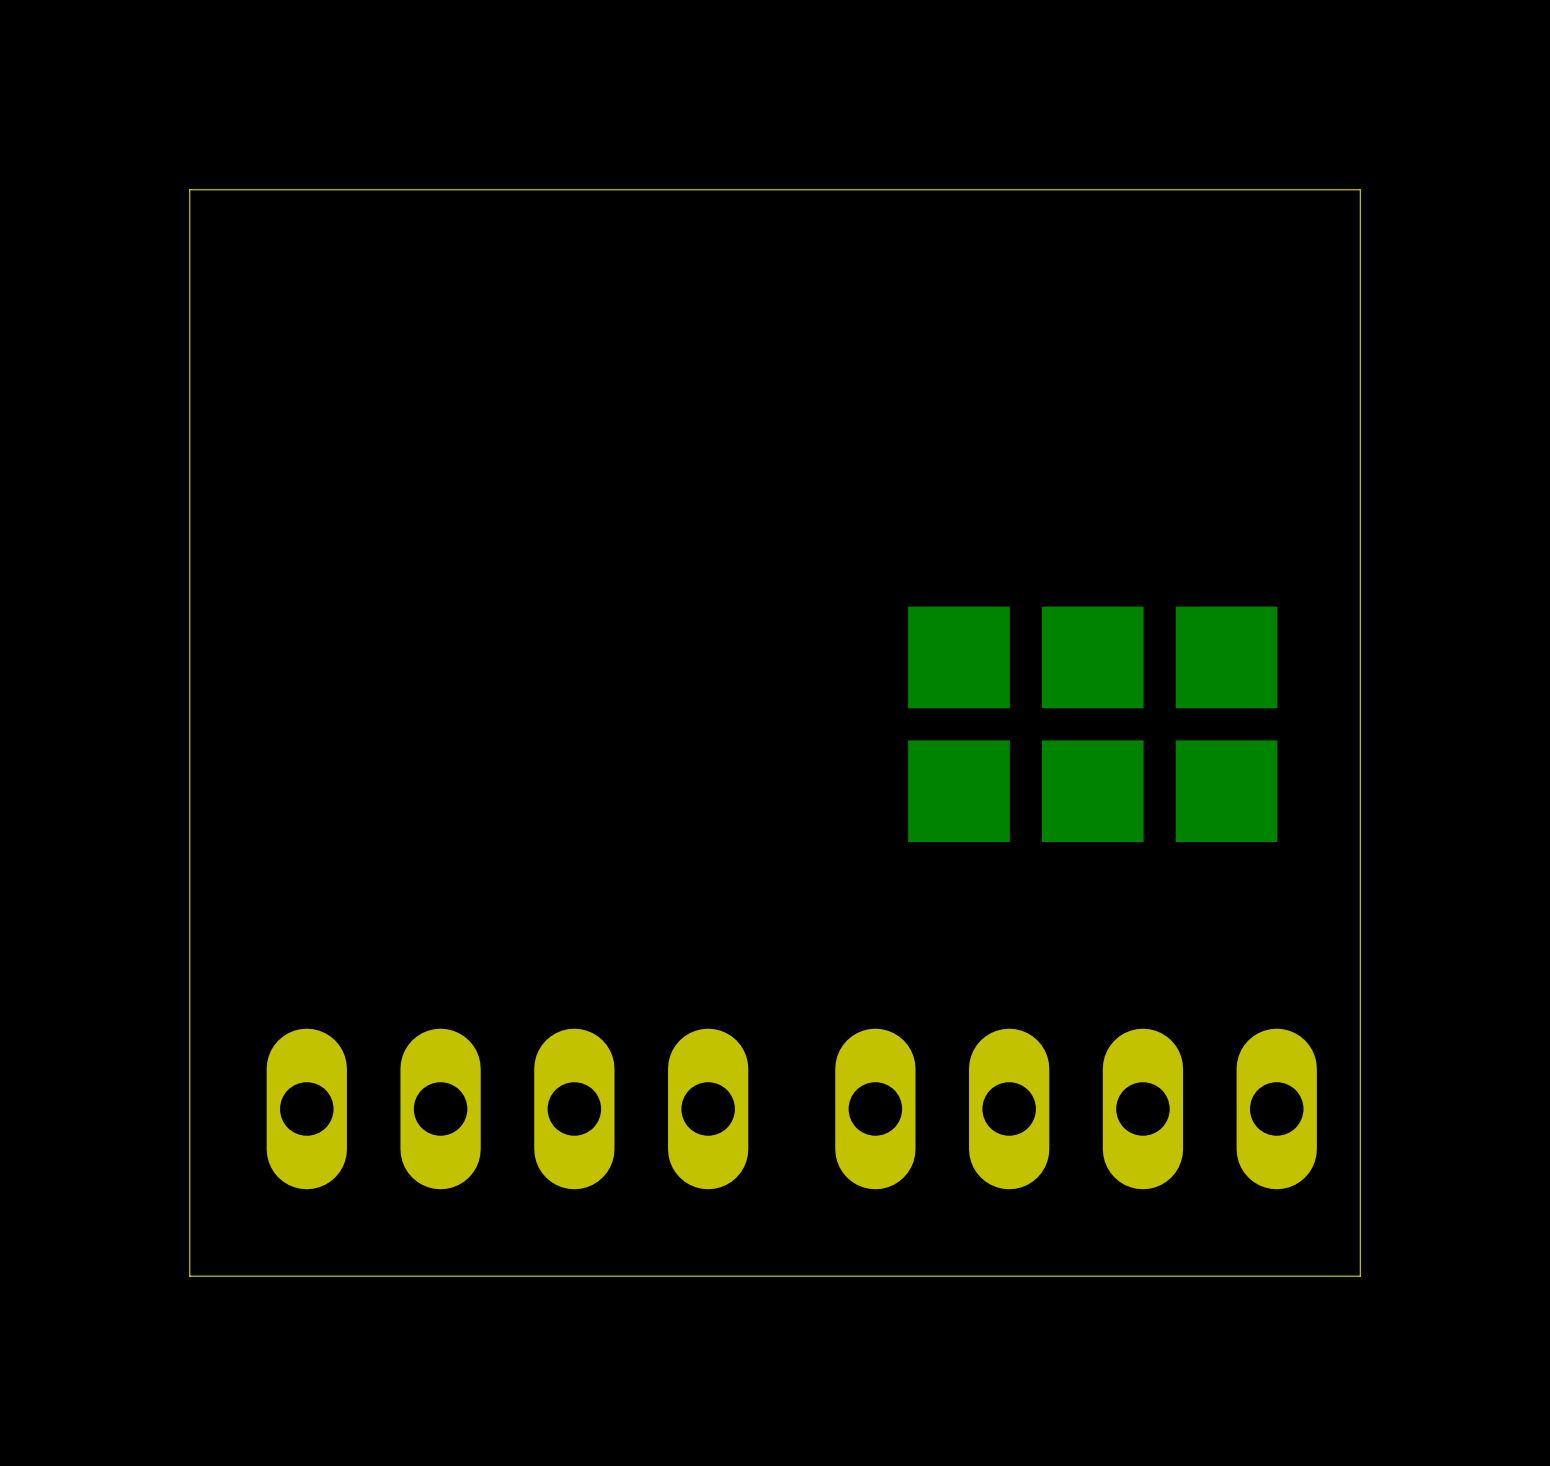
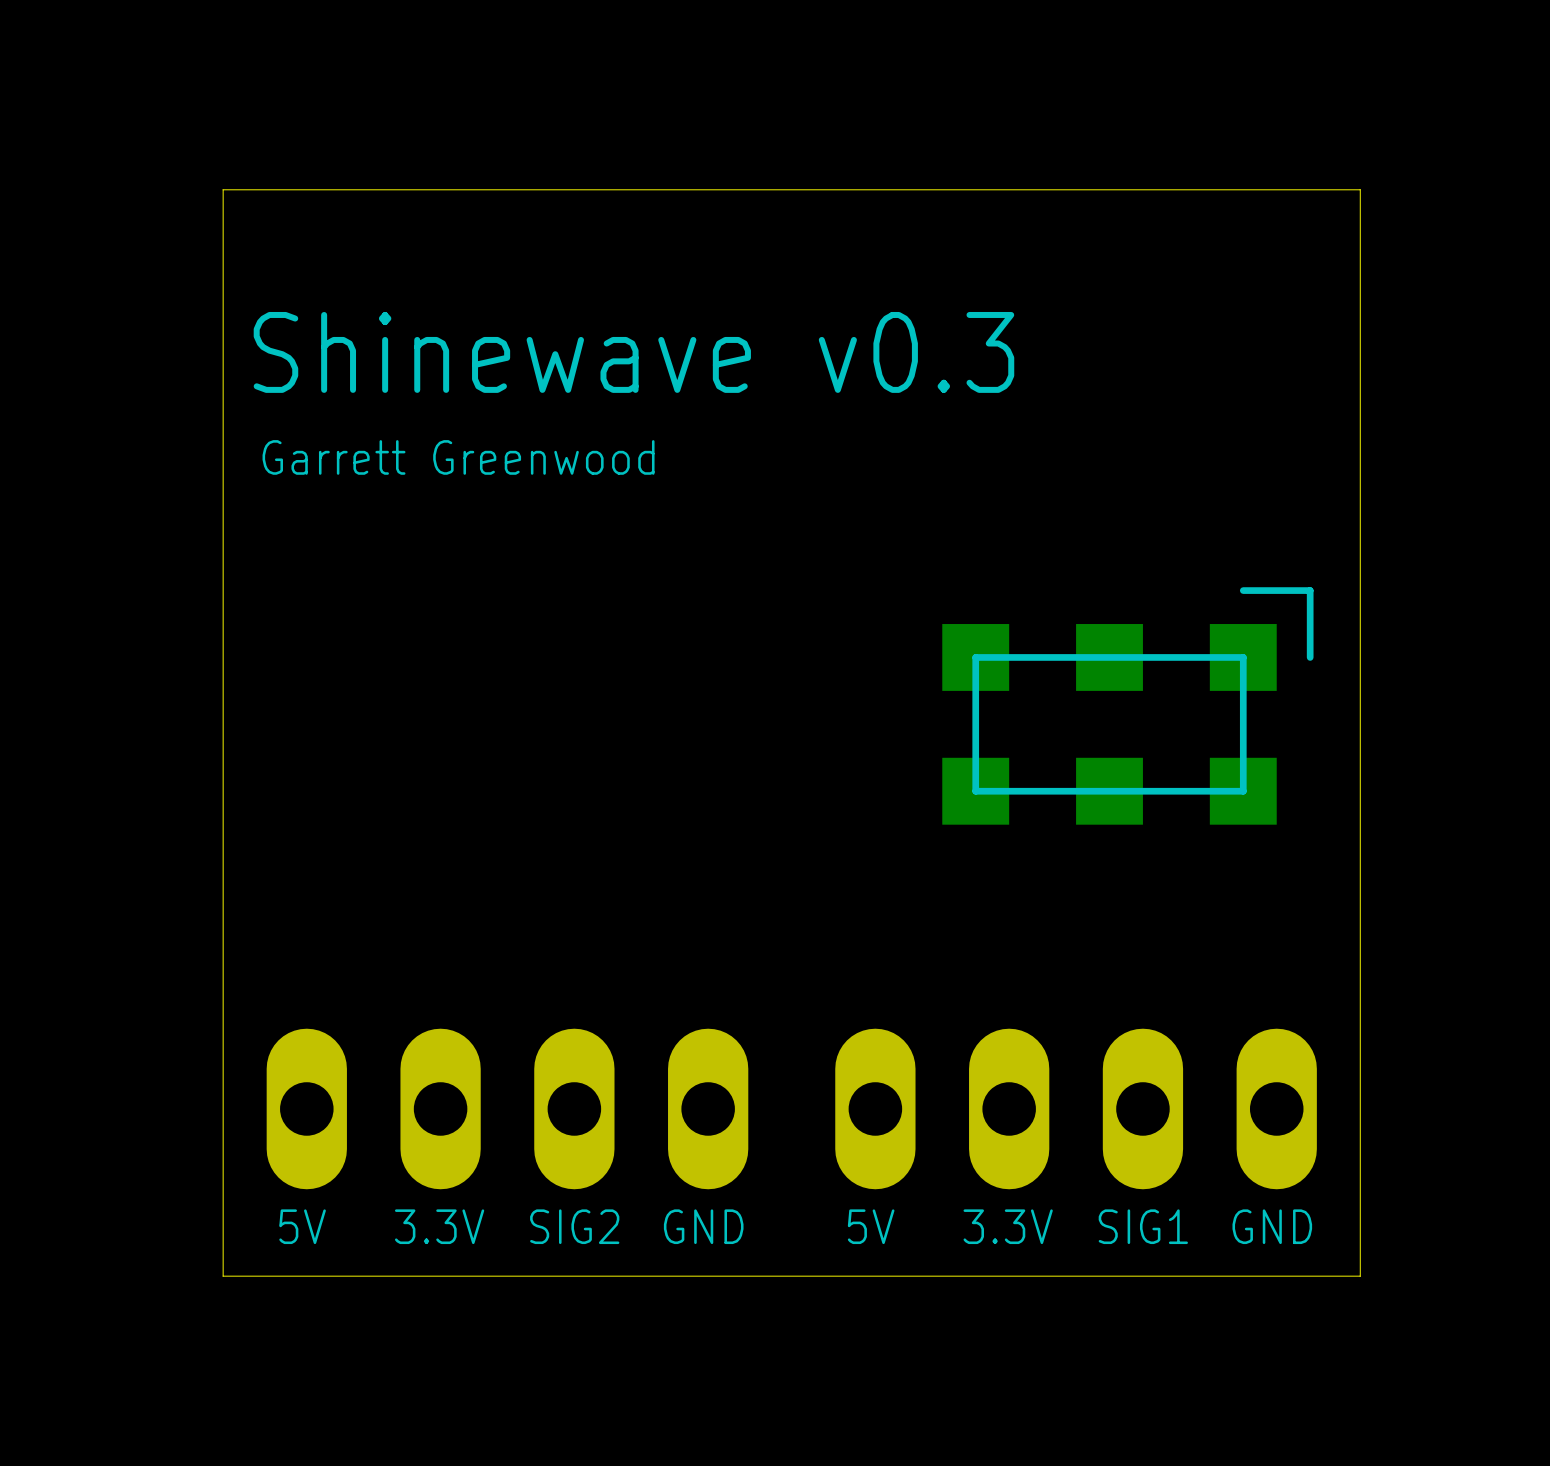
board edge: (223, 189) (189, 189) (189, 1276) (223, 1276) -> (223, 189) (223, 1276)
text: none -> Shinewave v0.3 (633, 352)
text: none -> Garrett Greenwood (458, 457)
part footprint: [908, 606, 1278, 843] -> [942, 587, 1314, 825]
text: none -> 5V (302, 1226)
text: none -> 3.3V (439, 1226)
text: none -> SIG2 (574, 1226)
text: none -> GND (703, 1226)
text: none -> 5V (871, 1226)
text: none -> 3.3V (1008, 1226)
text: none -> SIG1 (1143, 1226)
text: none -> GND (1272, 1226)

